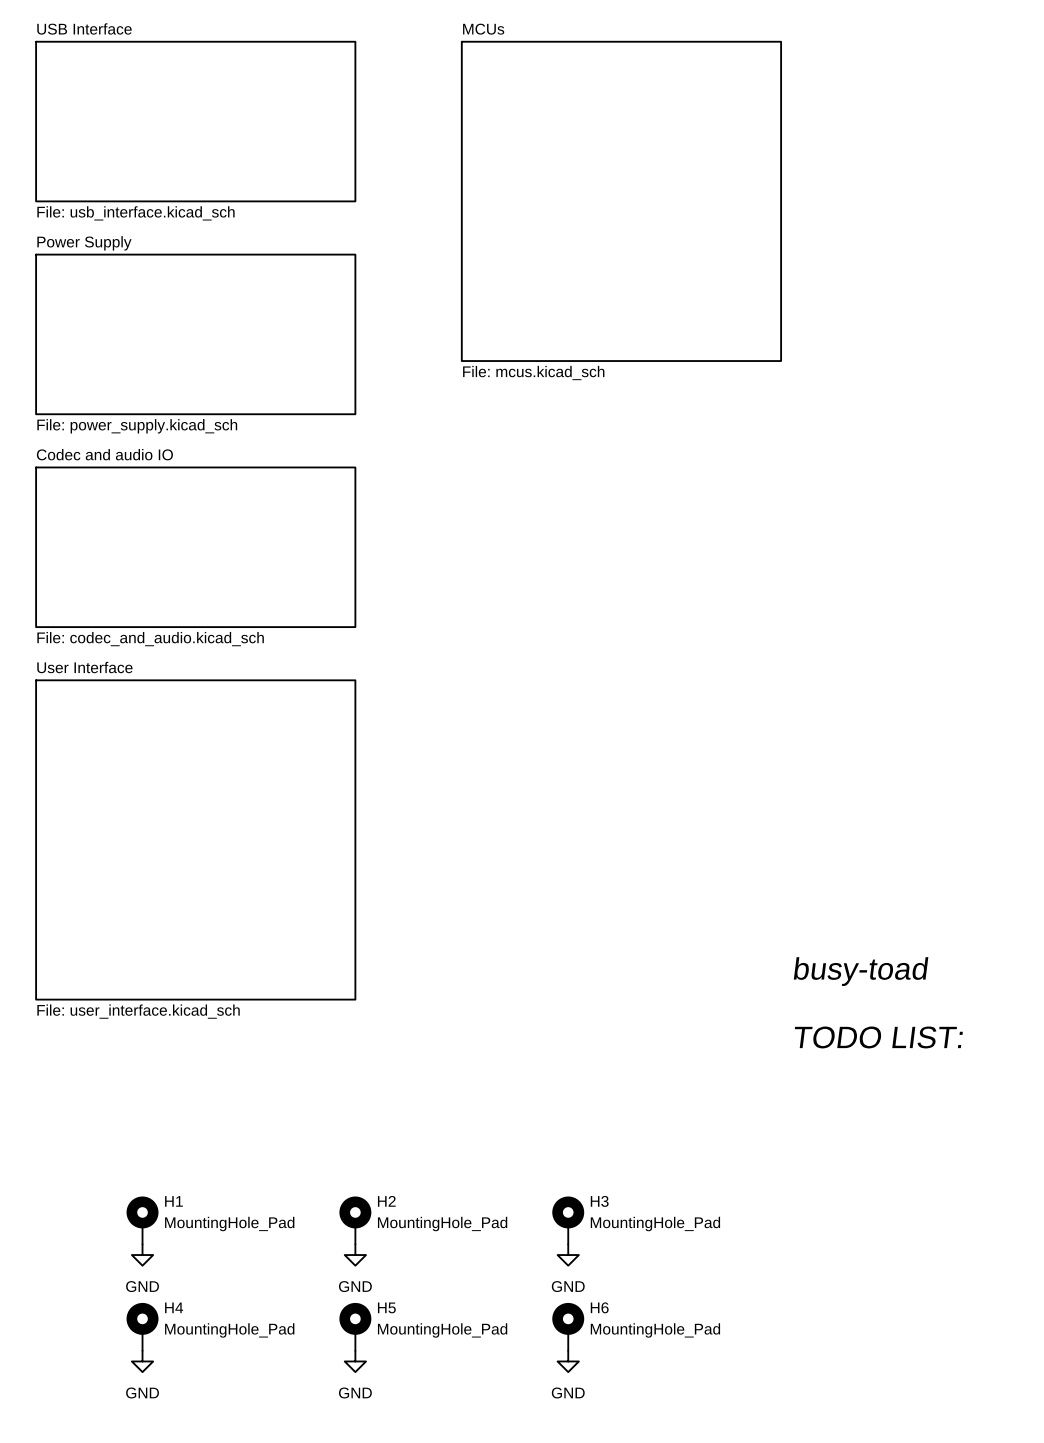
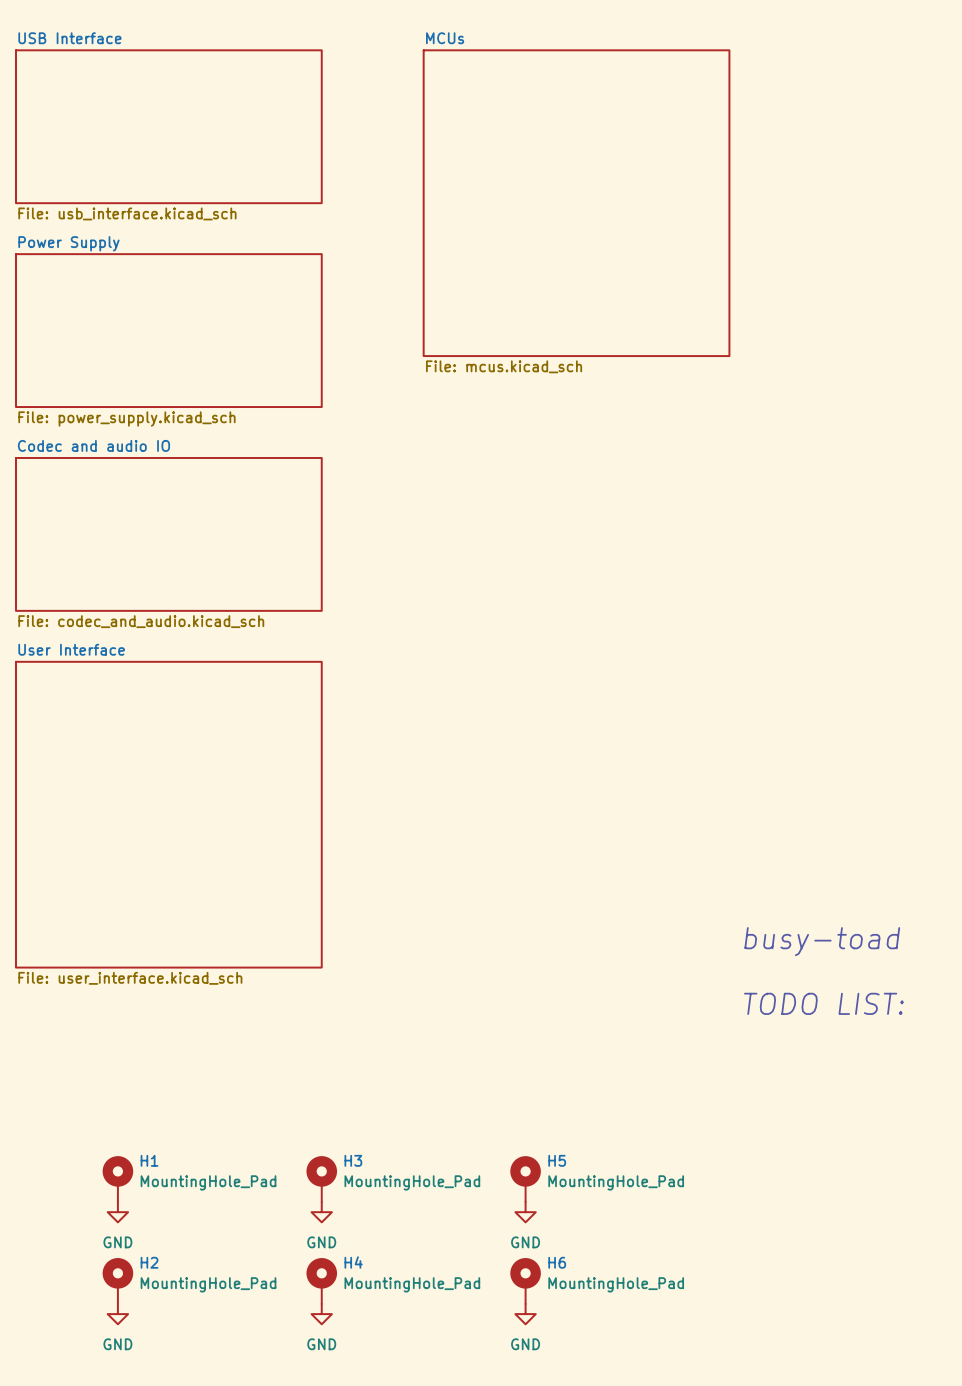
H2 name: H2 (386, 1201) -> H3 (353, 1160)
H3 name: H3 (599, 1201) -> H5 (557, 1160)
H4 name: H4 (174, 1307) -> H2 (149, 1262)
H5 name: H5 (386, 1307) -> H4 (353, 1262)

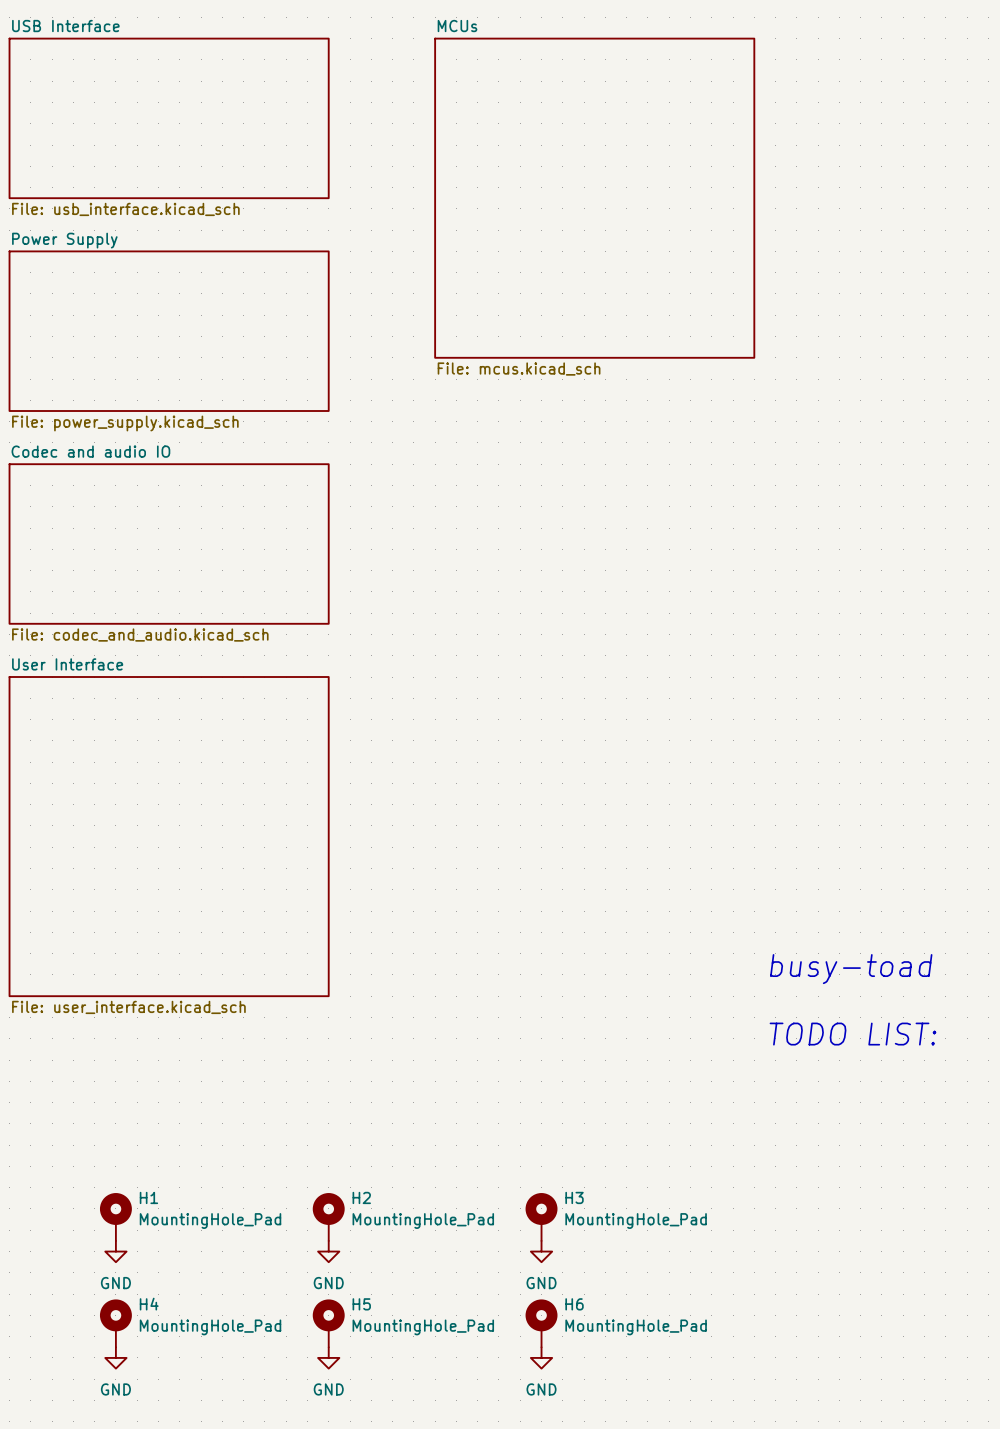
H3 name: H3 (353, 1160) -> H2 (361, 1197)
H5 name: H5 (557, 1160) -> H3 (574, 1197)
H2 name: H2 (149, 1262) -> H4 (149, 1304)
H4 name: H4 (353, 1262) -> H5 (361, 1304)

